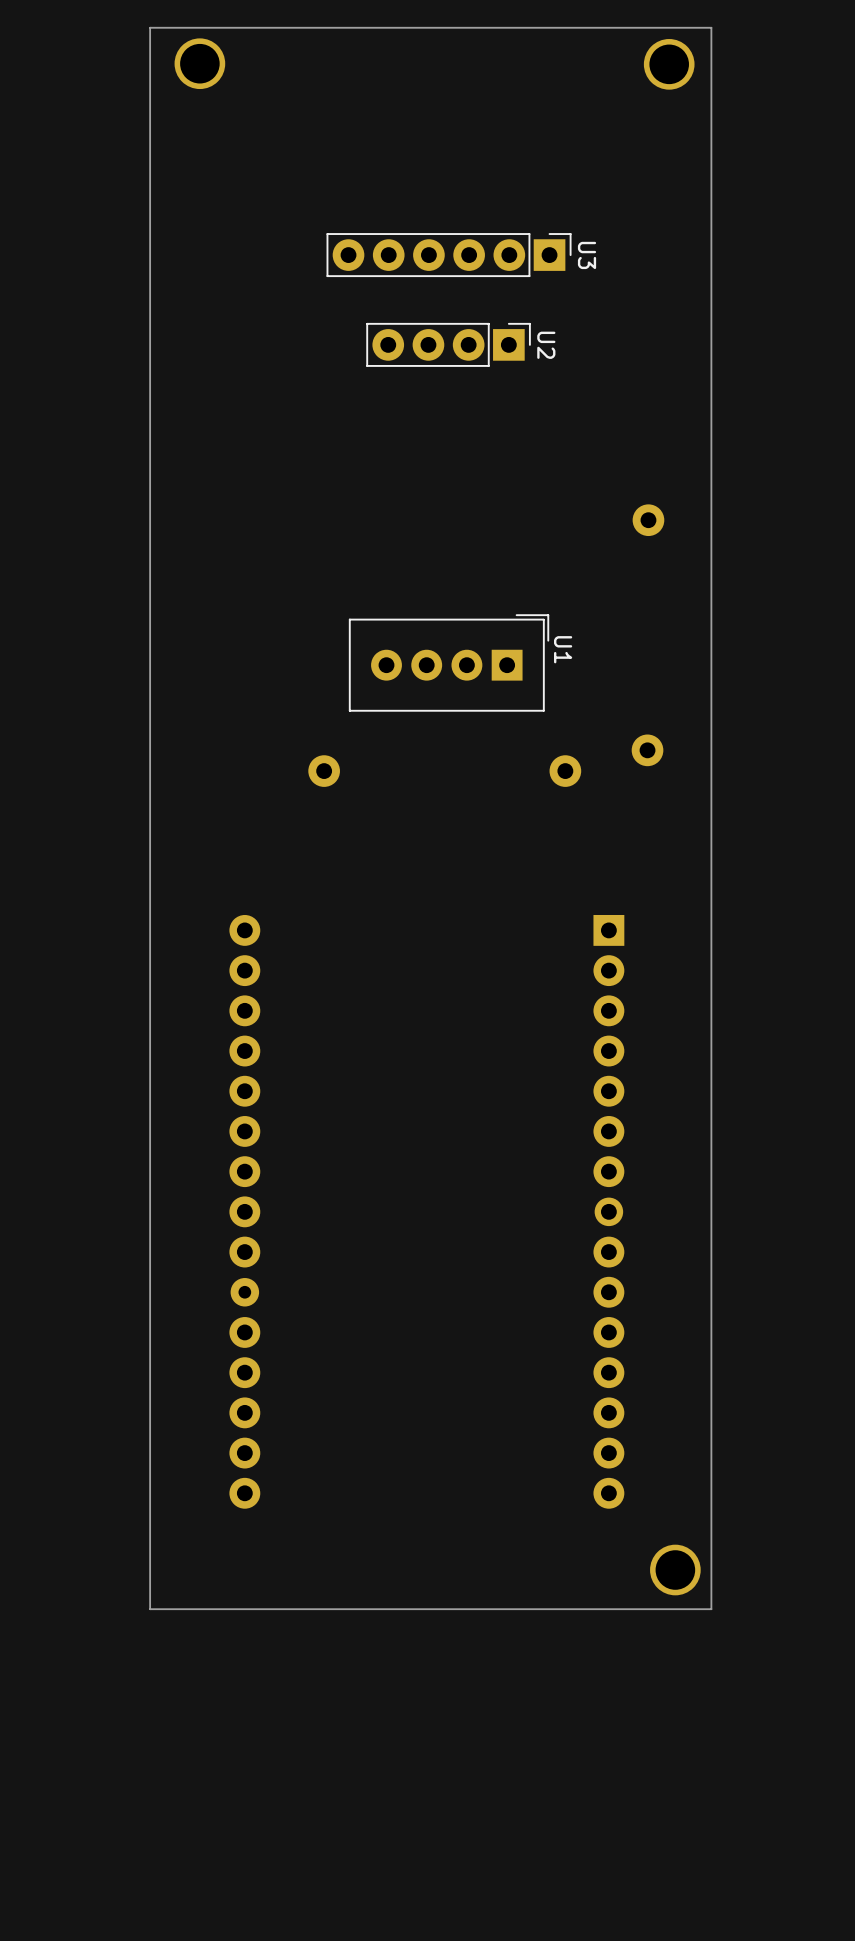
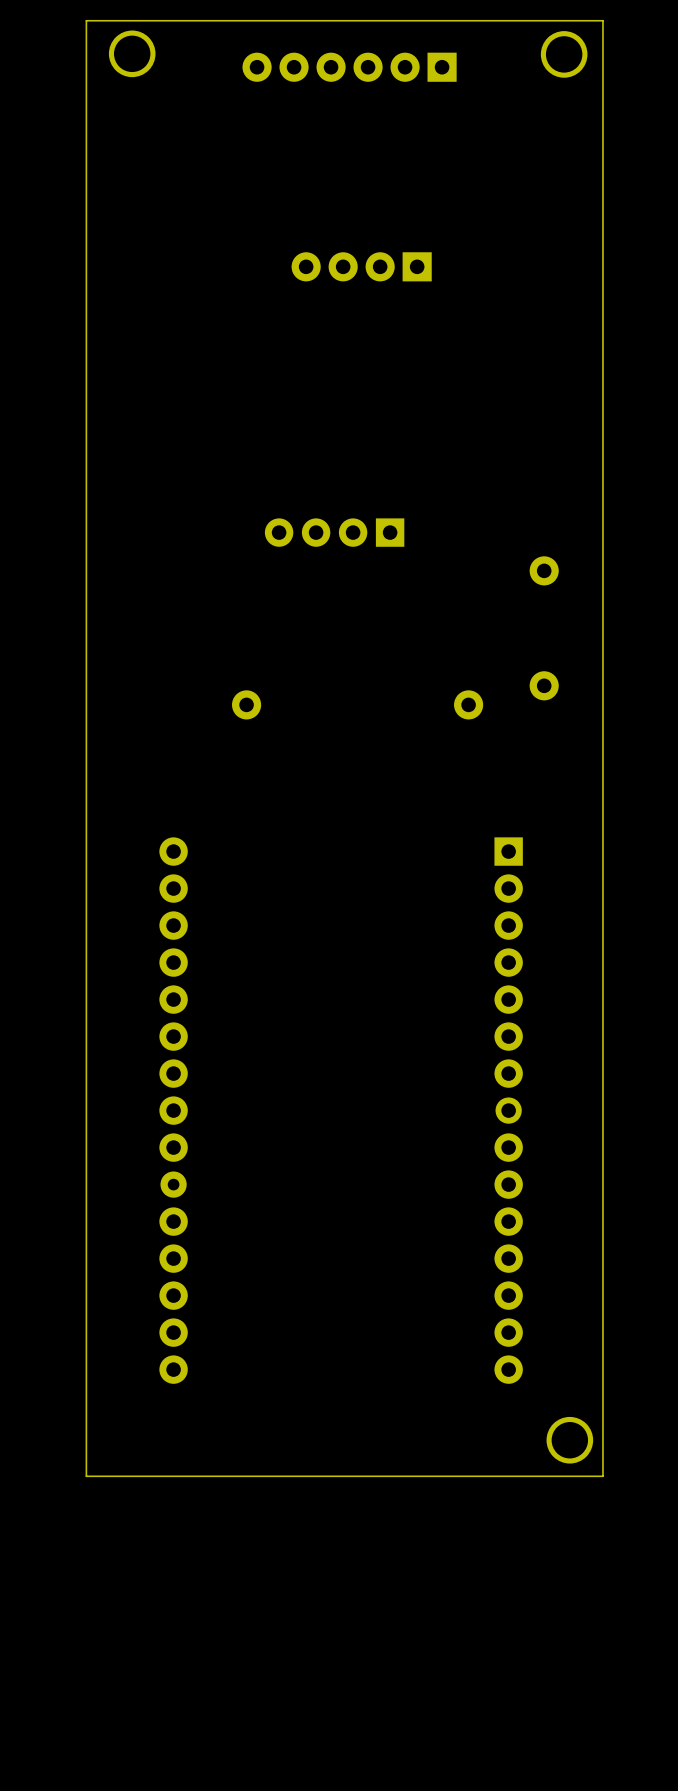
U3 side: bottom (449, 255) -> top (349, 67)
U2 side: bottom (448, 344) -> top (361, 266)
part position: (648, 520) -> (544, 570)
U1 side: bottom (449, 662) -> top (334, 532)

